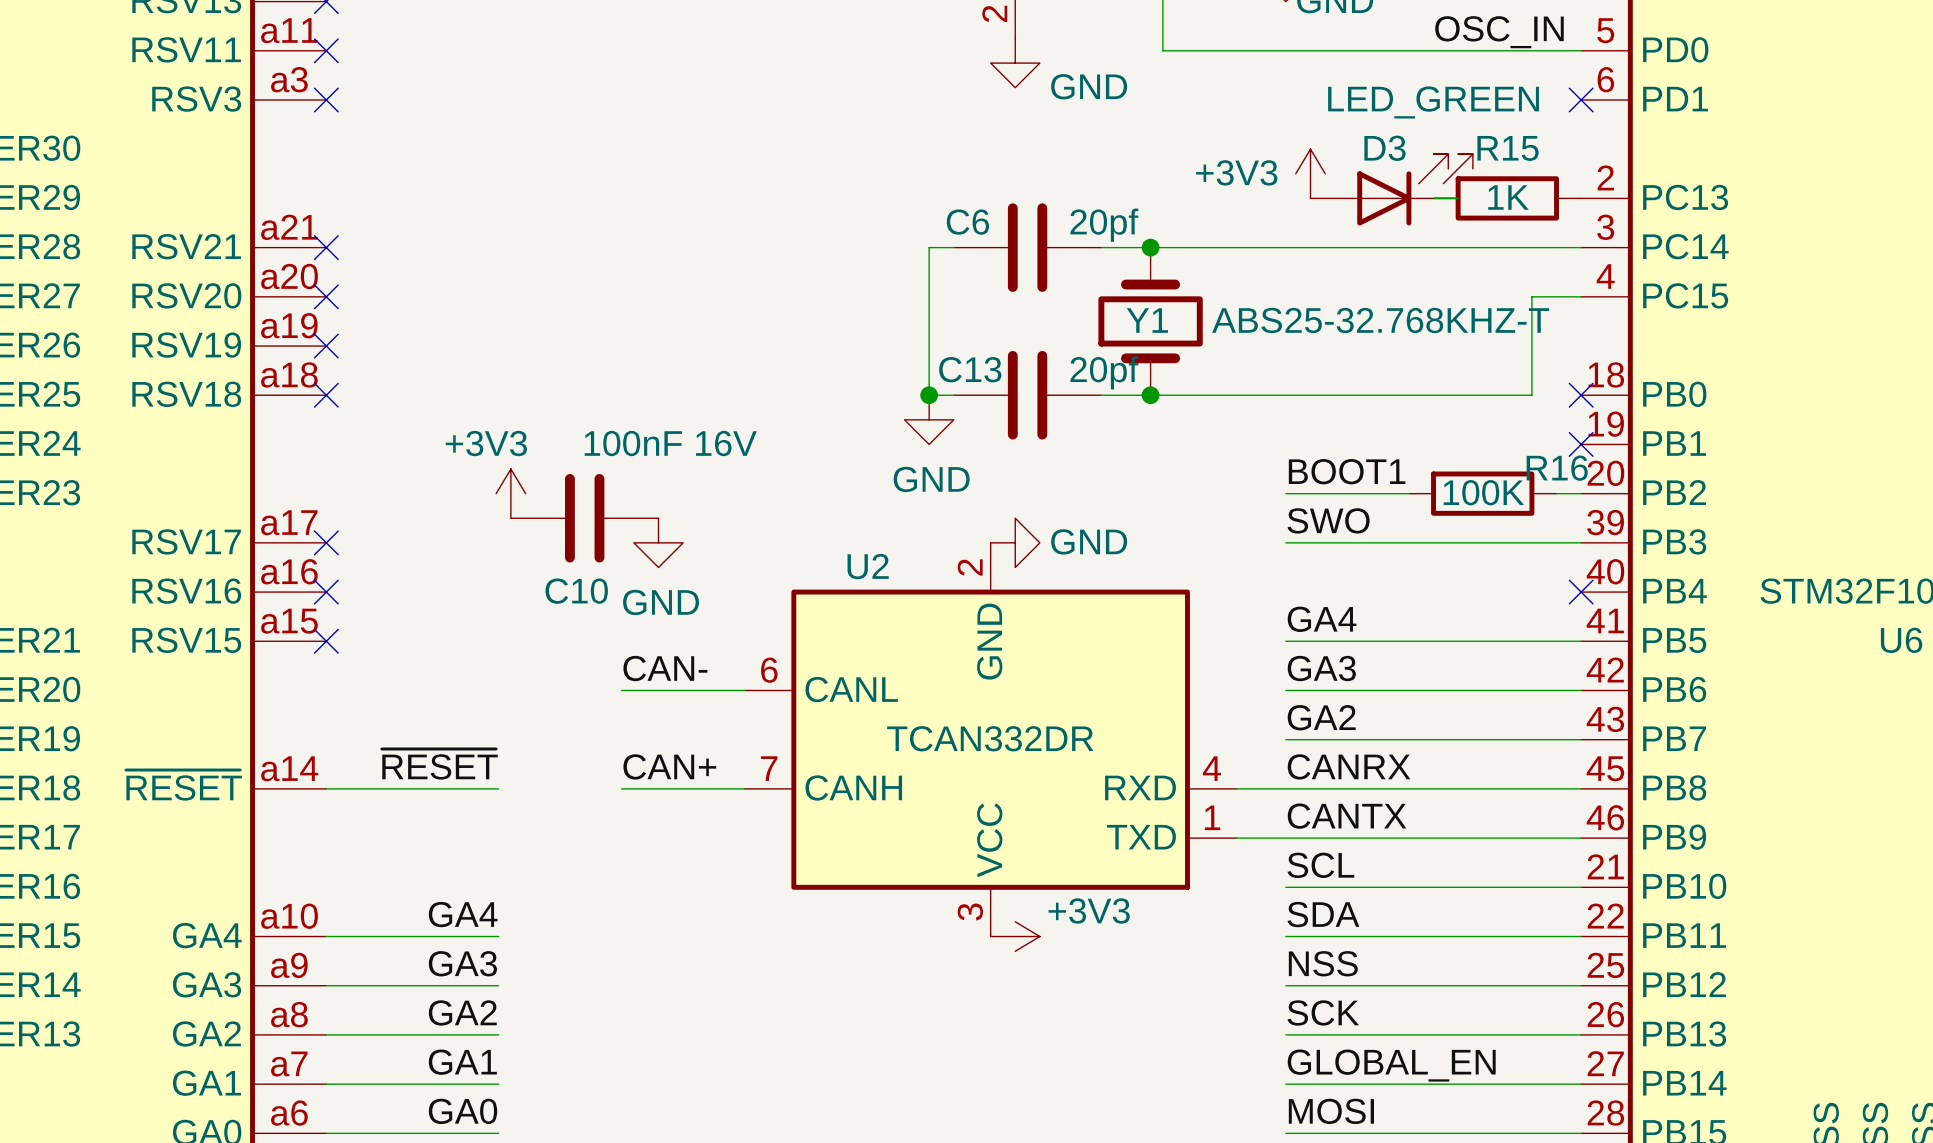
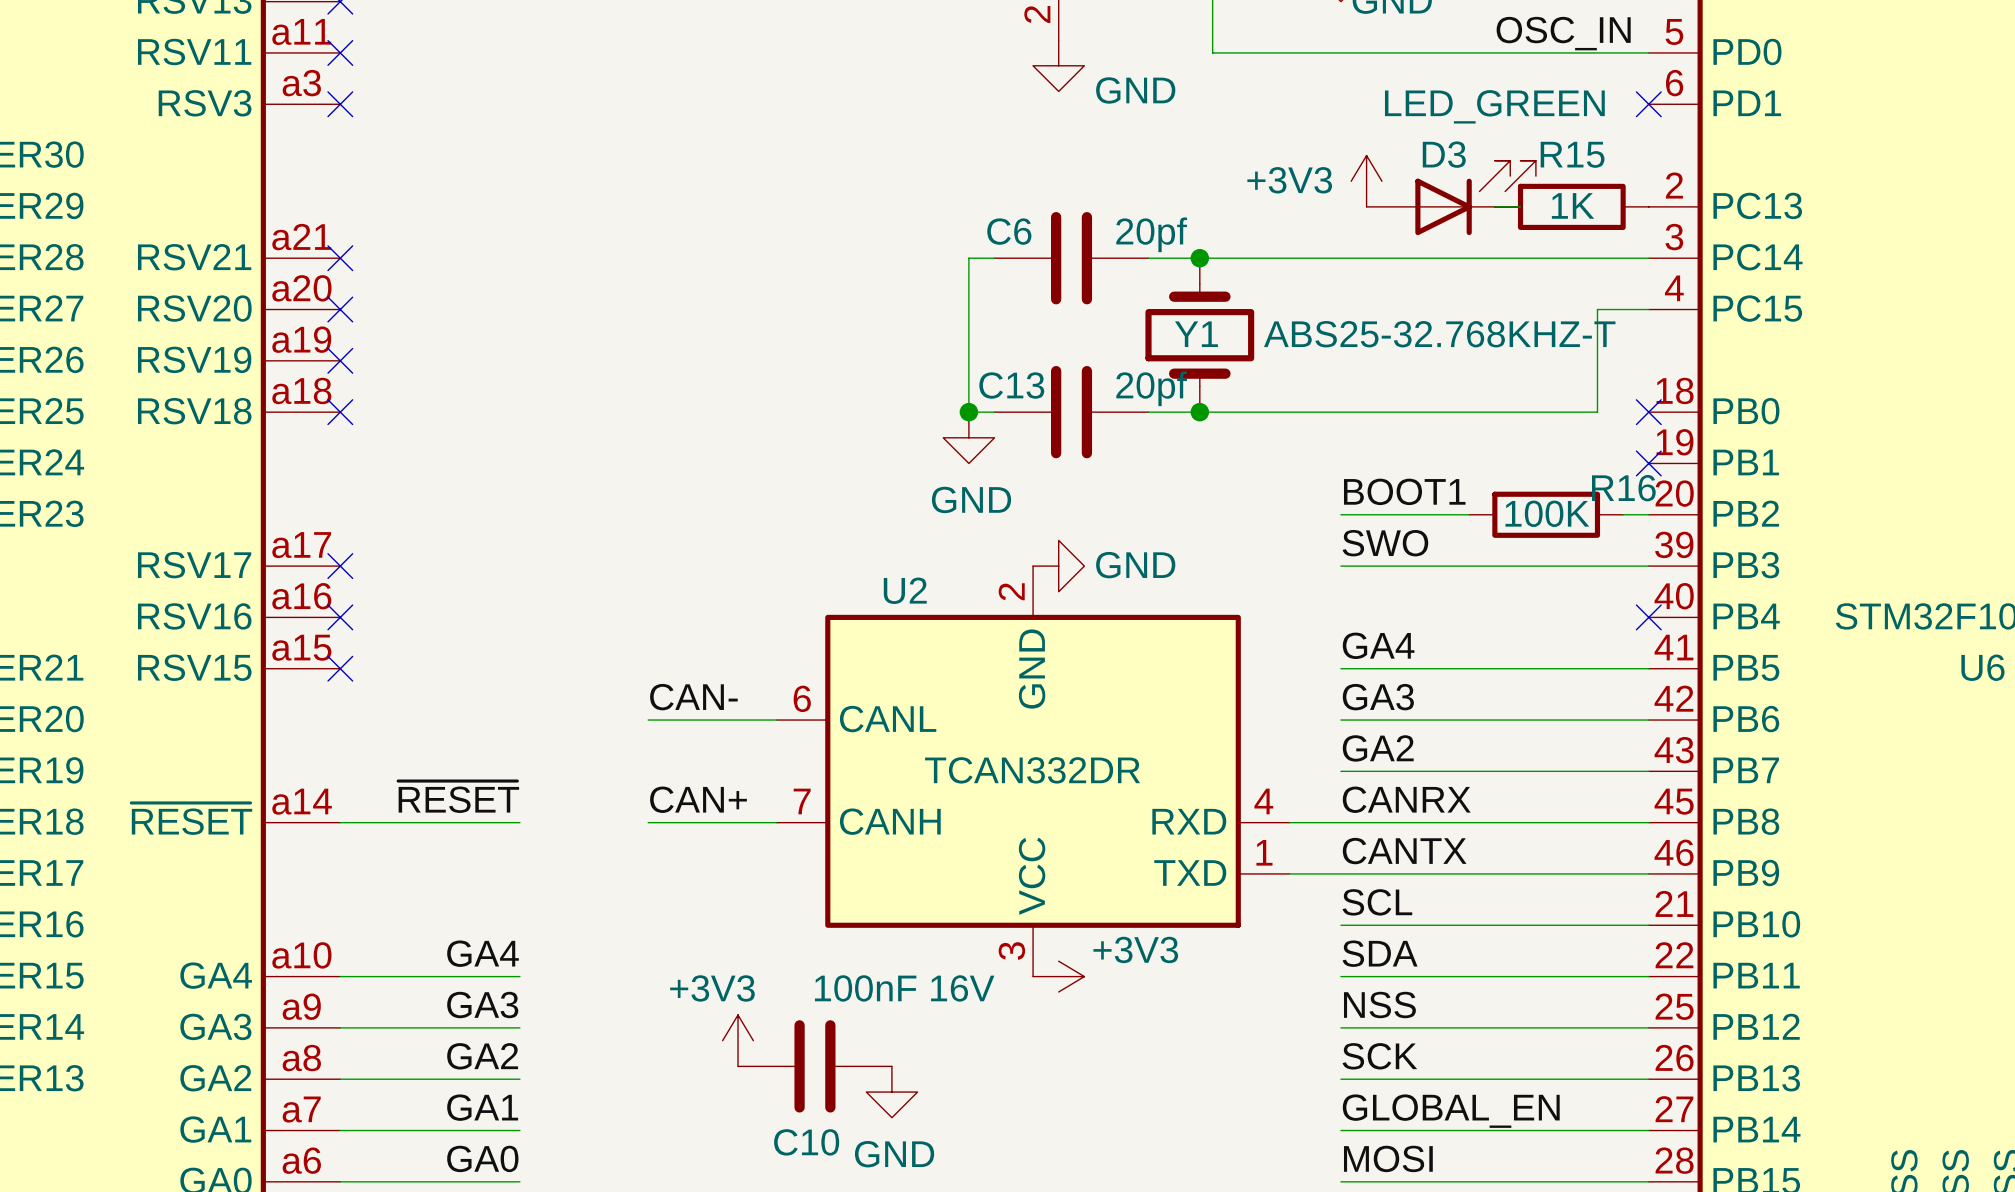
power symbol: +3V3 (510, 493) -> none
C10 position: (584, 518) -> (814, 1066)
power symbol: GND (658, 542) -> none
power symbol: none -> +3V3 (738, 1040)
power symbol: none -> GND (891, 1092)

